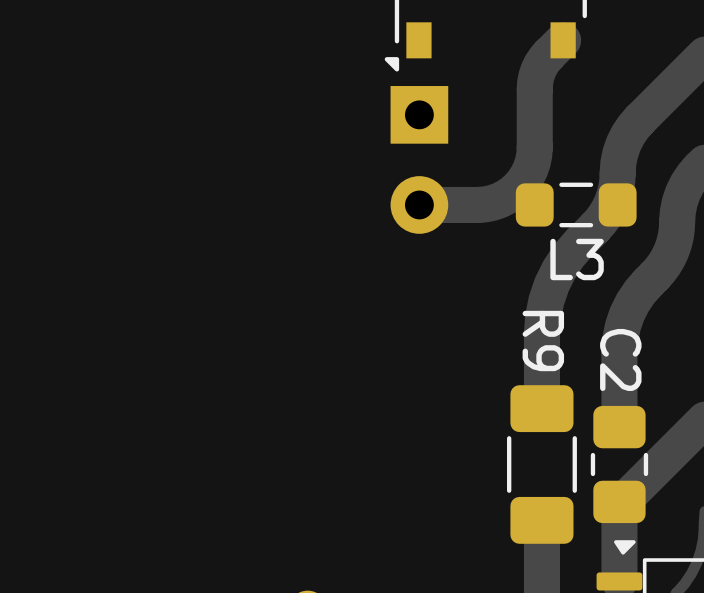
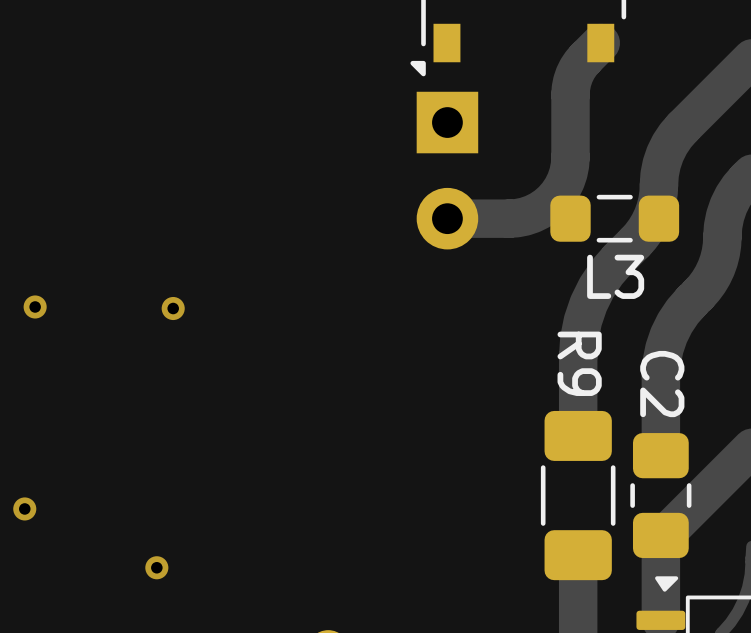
via: none -> (35, 306)
via: none -> (173, 308)
via: none -> (24, 508)
via: none -> (156, 567)

